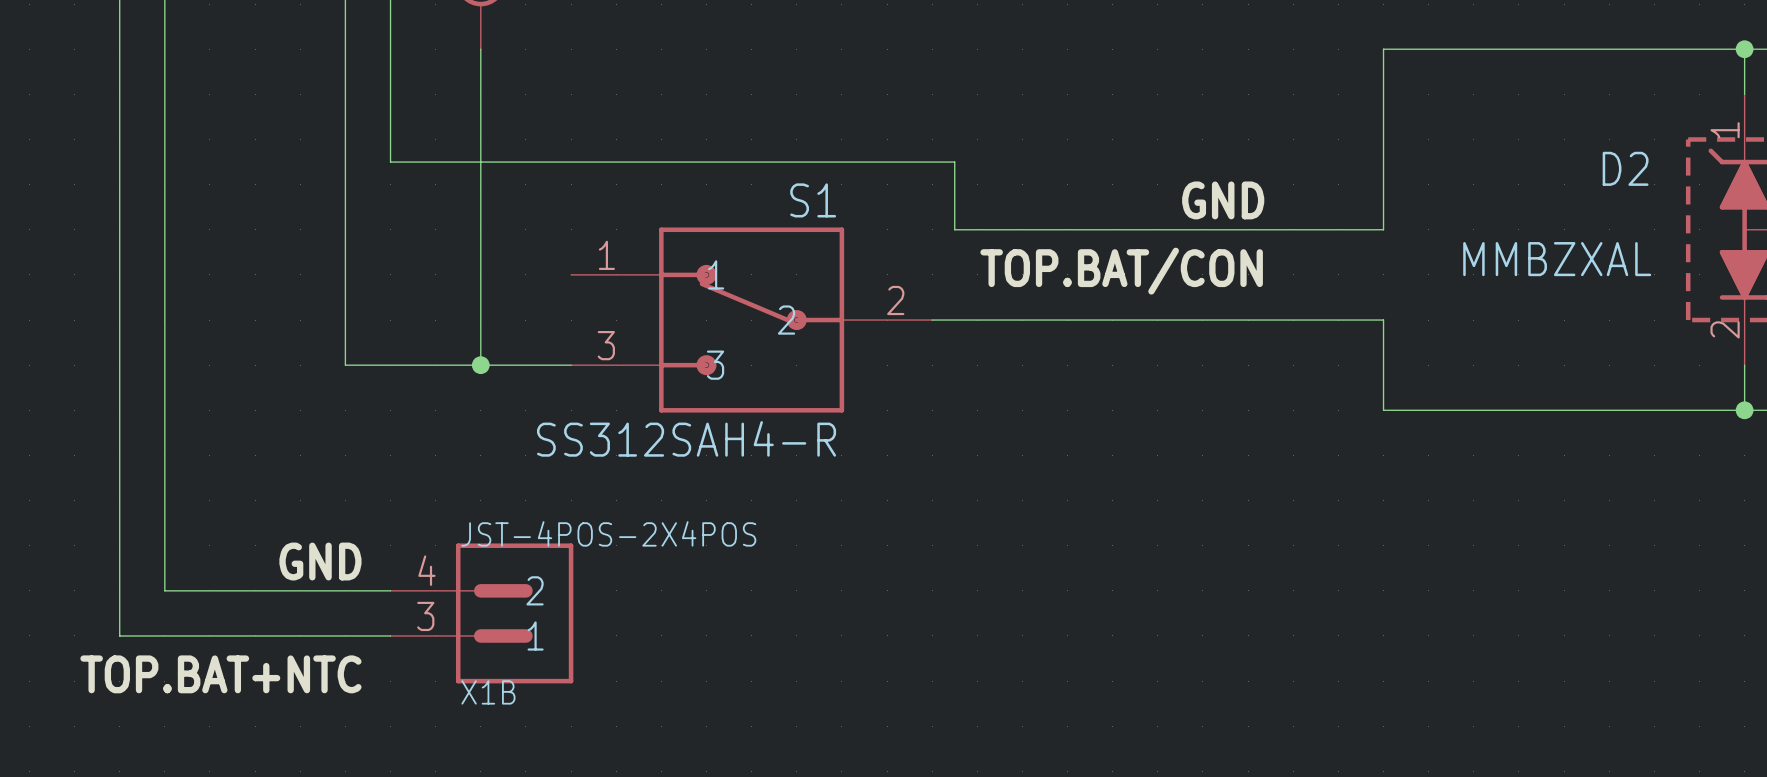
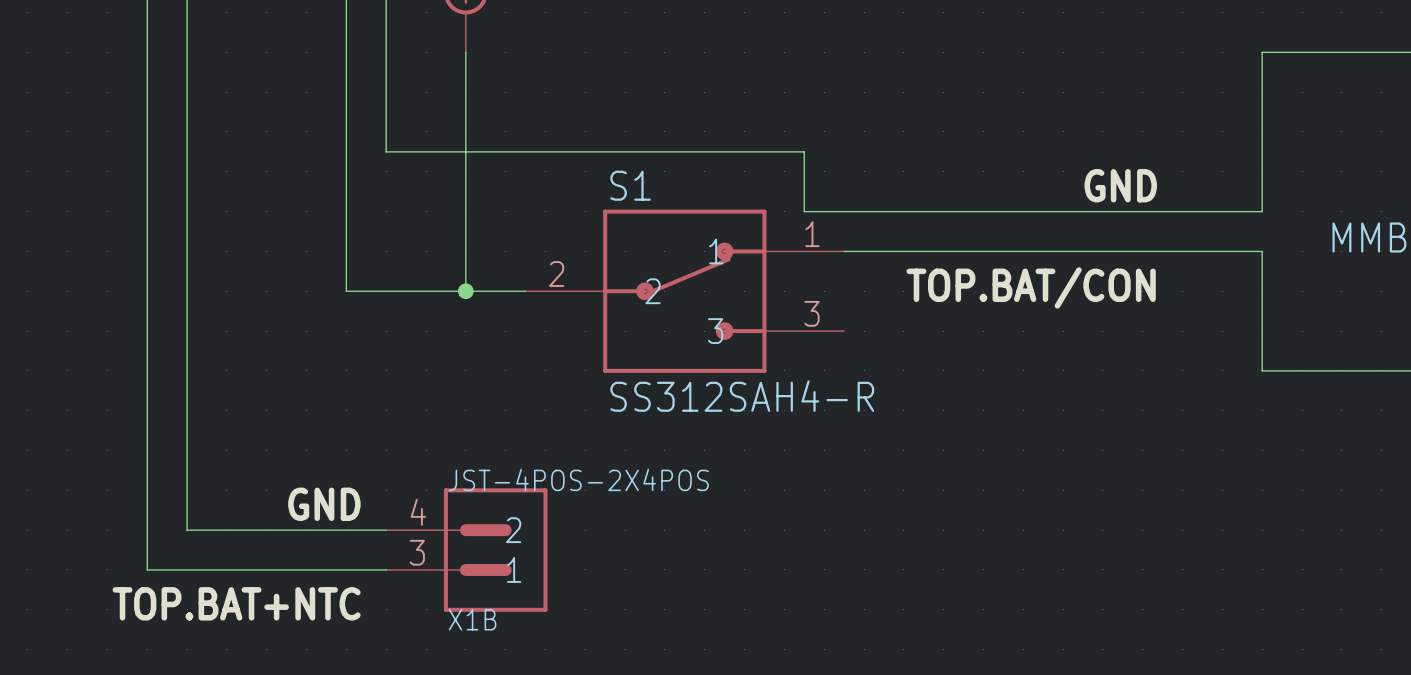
wire: (864, 162) (954, 162) (954, 229) -> (804, 151) (804, 211) (883, 211)
label position: TOP.BAT/CON (1121, 271) -> TOP.BAT/CON (1031, 287)
wire: (345, 320) (345, 365) (571, 365) -> (346, 291) (525, 291)
wire: (480, 320) (480, 365) -> none
S1 flip: as is (751, 320) -> left-right (684, 291)
wire: (932, 320) (1383, 320) -> (844, 251) (1262, 251) (1262, 291)
junction position: (480, 365) -> (465, 291)

